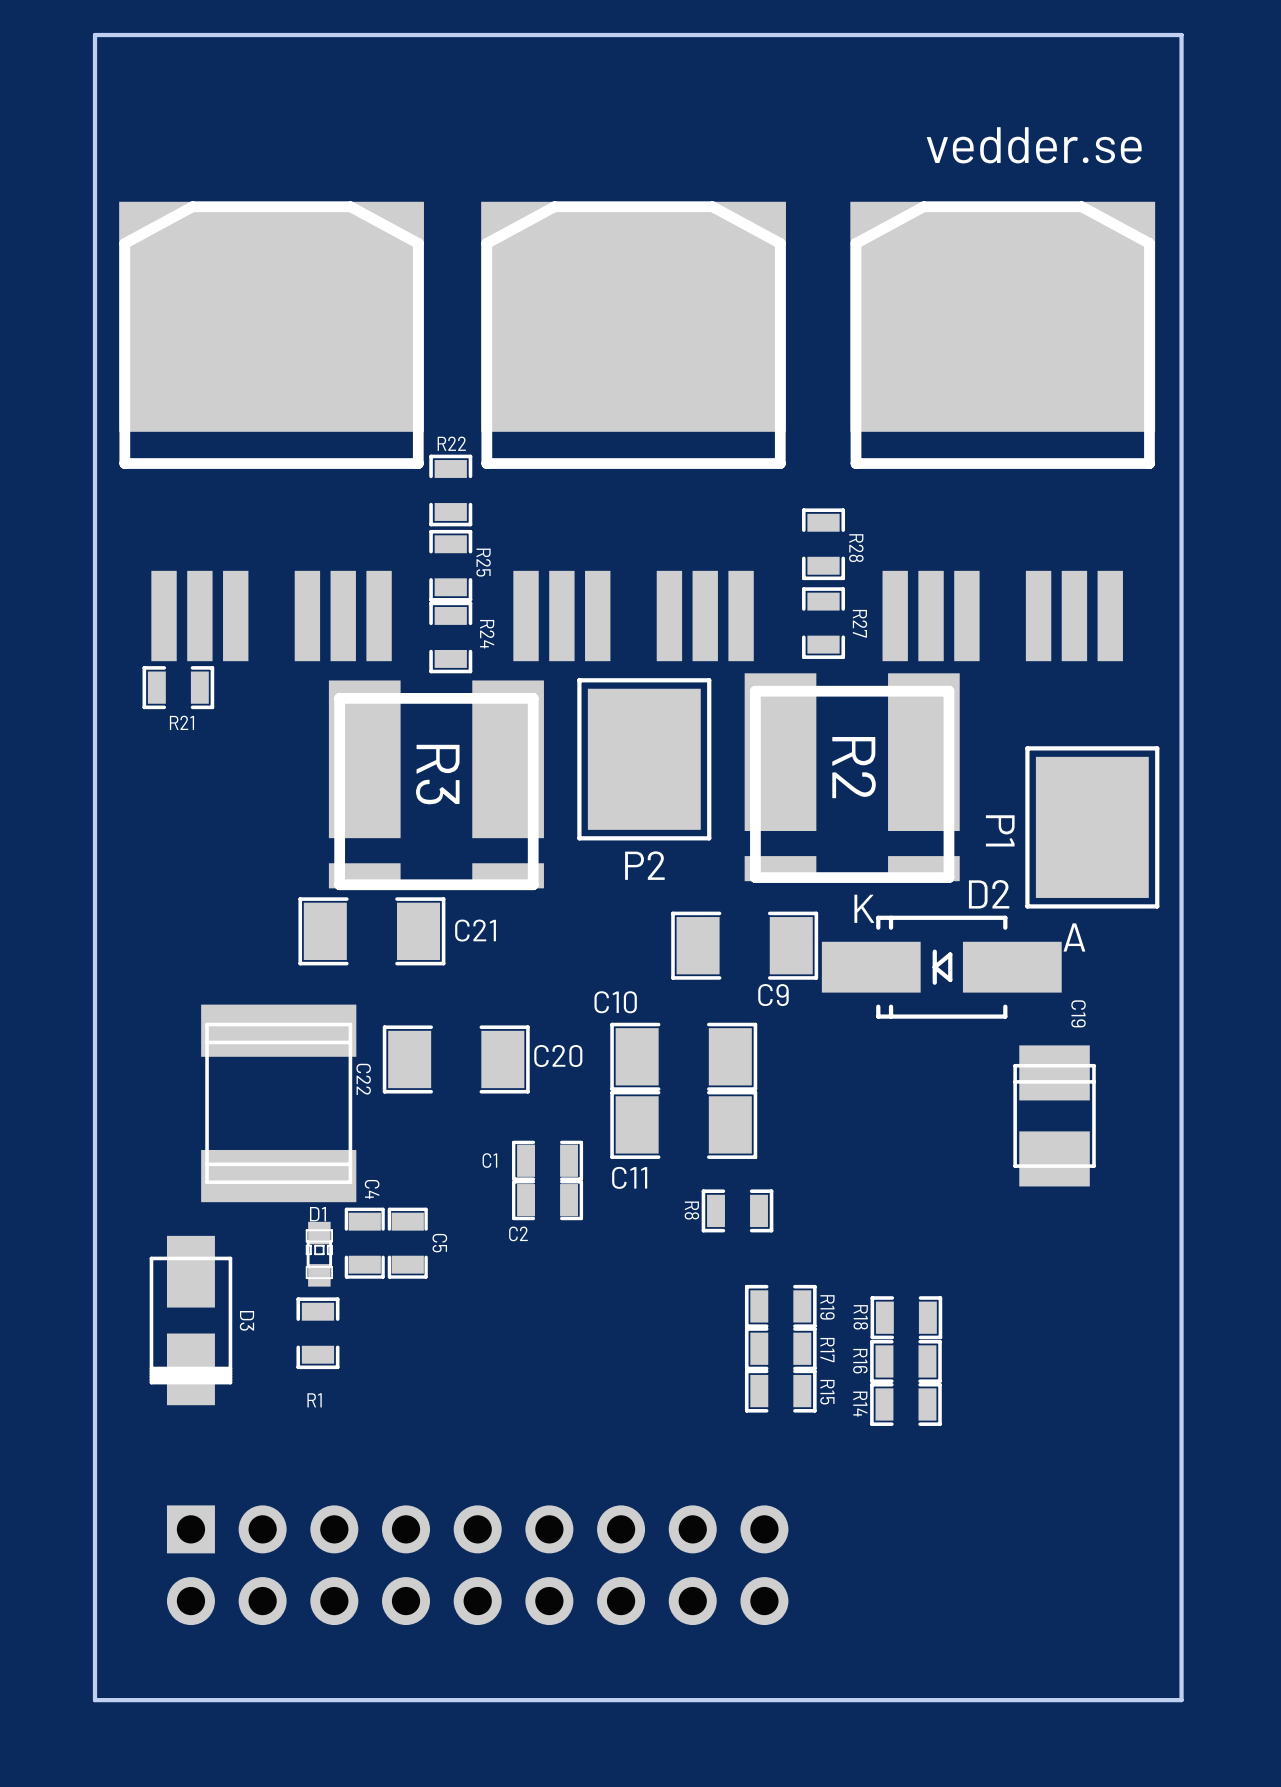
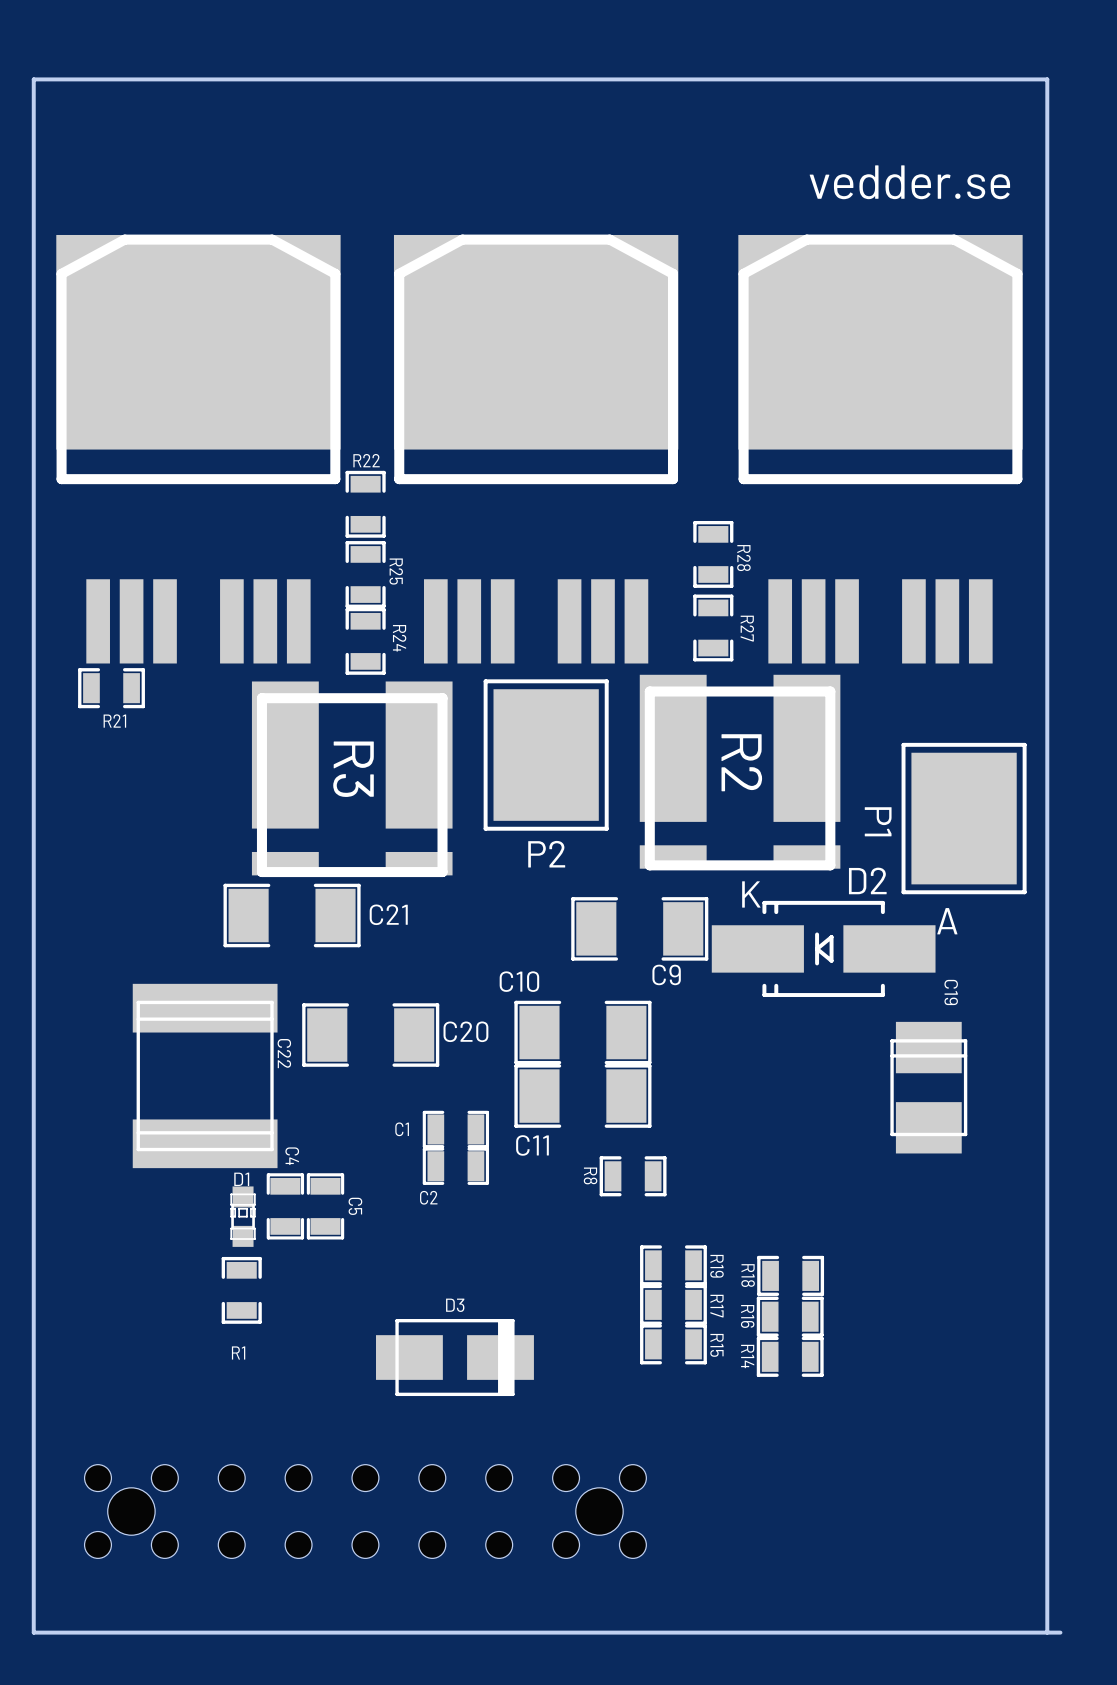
D3 rotation: 0° (190, 1320) -> 90° counterclockwise (454, 1357)
D3 position: (190, 1320) -> (454, 1357)
part footprint: [166, 1505, 789, 1626] -> [84, 1464, 647, 1559]
board edge: none -> (1060, 1632) (1047, 1632)

